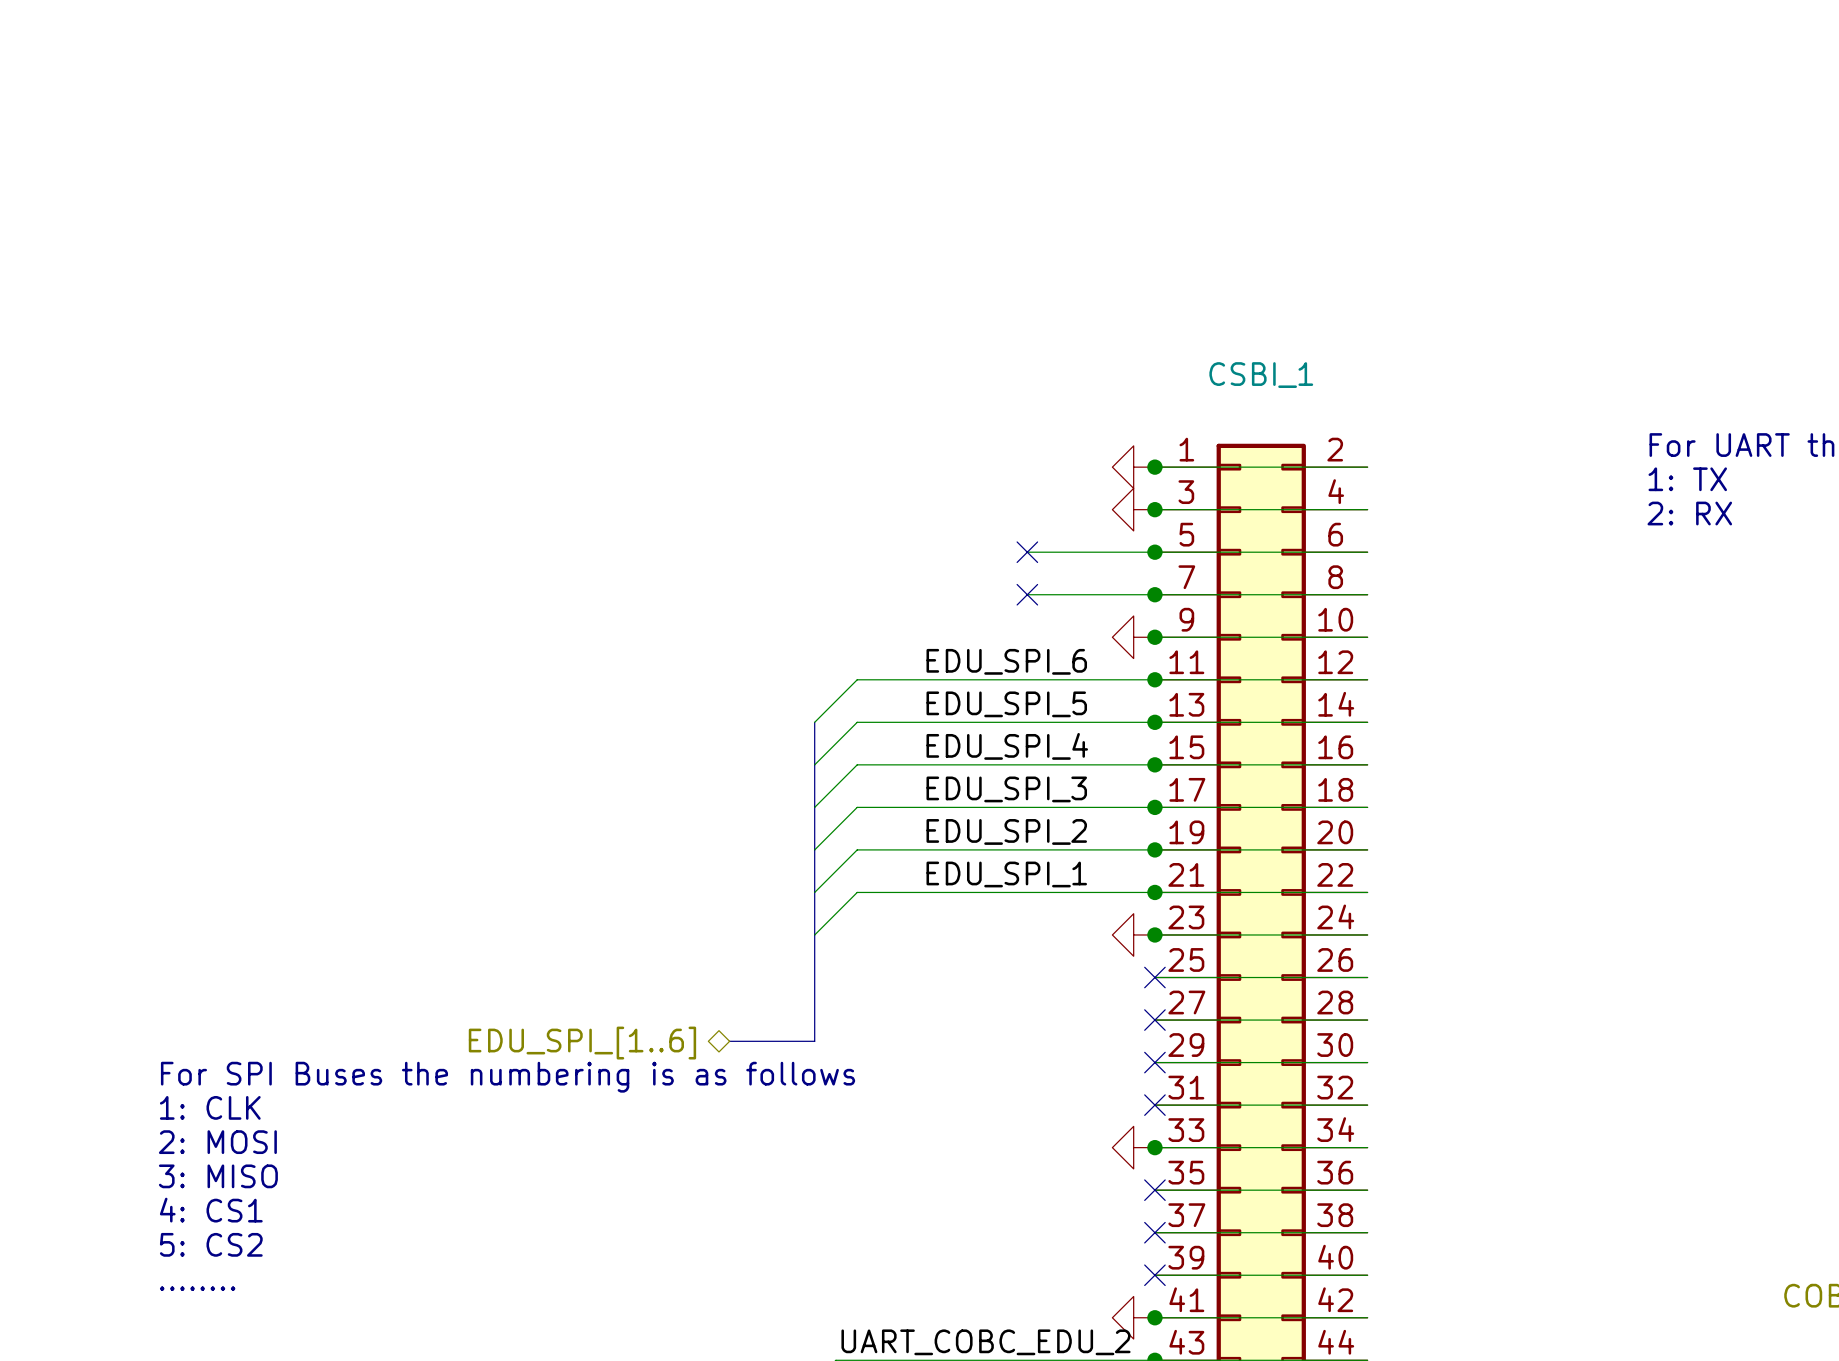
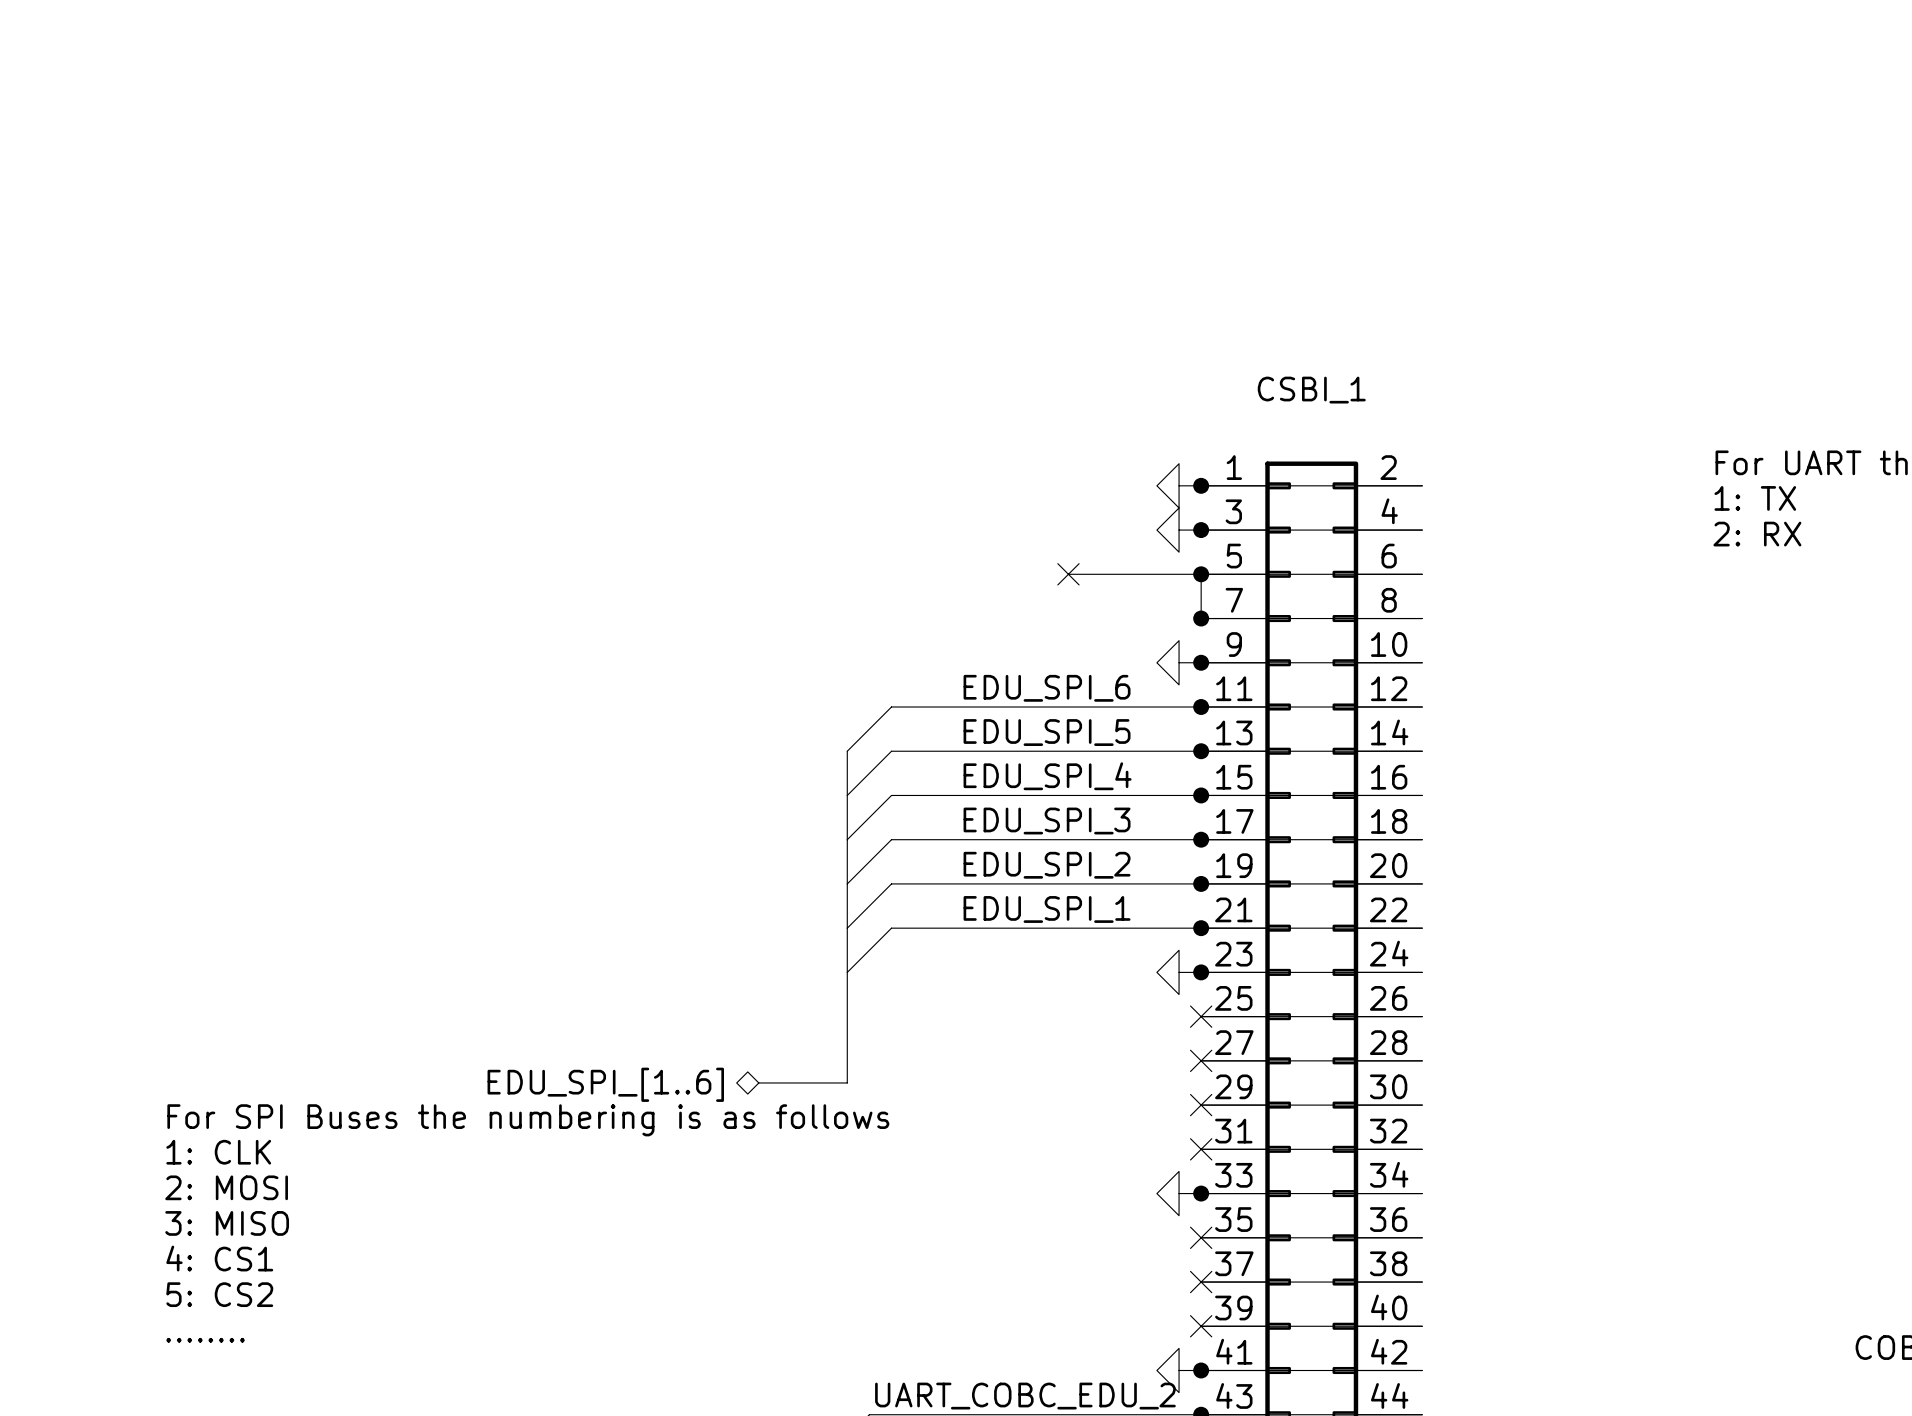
wire: (1027, 594) (1154, 594) -> (1201, 574) (1201, 618)
no-connect mark: (1027, 594) -> none

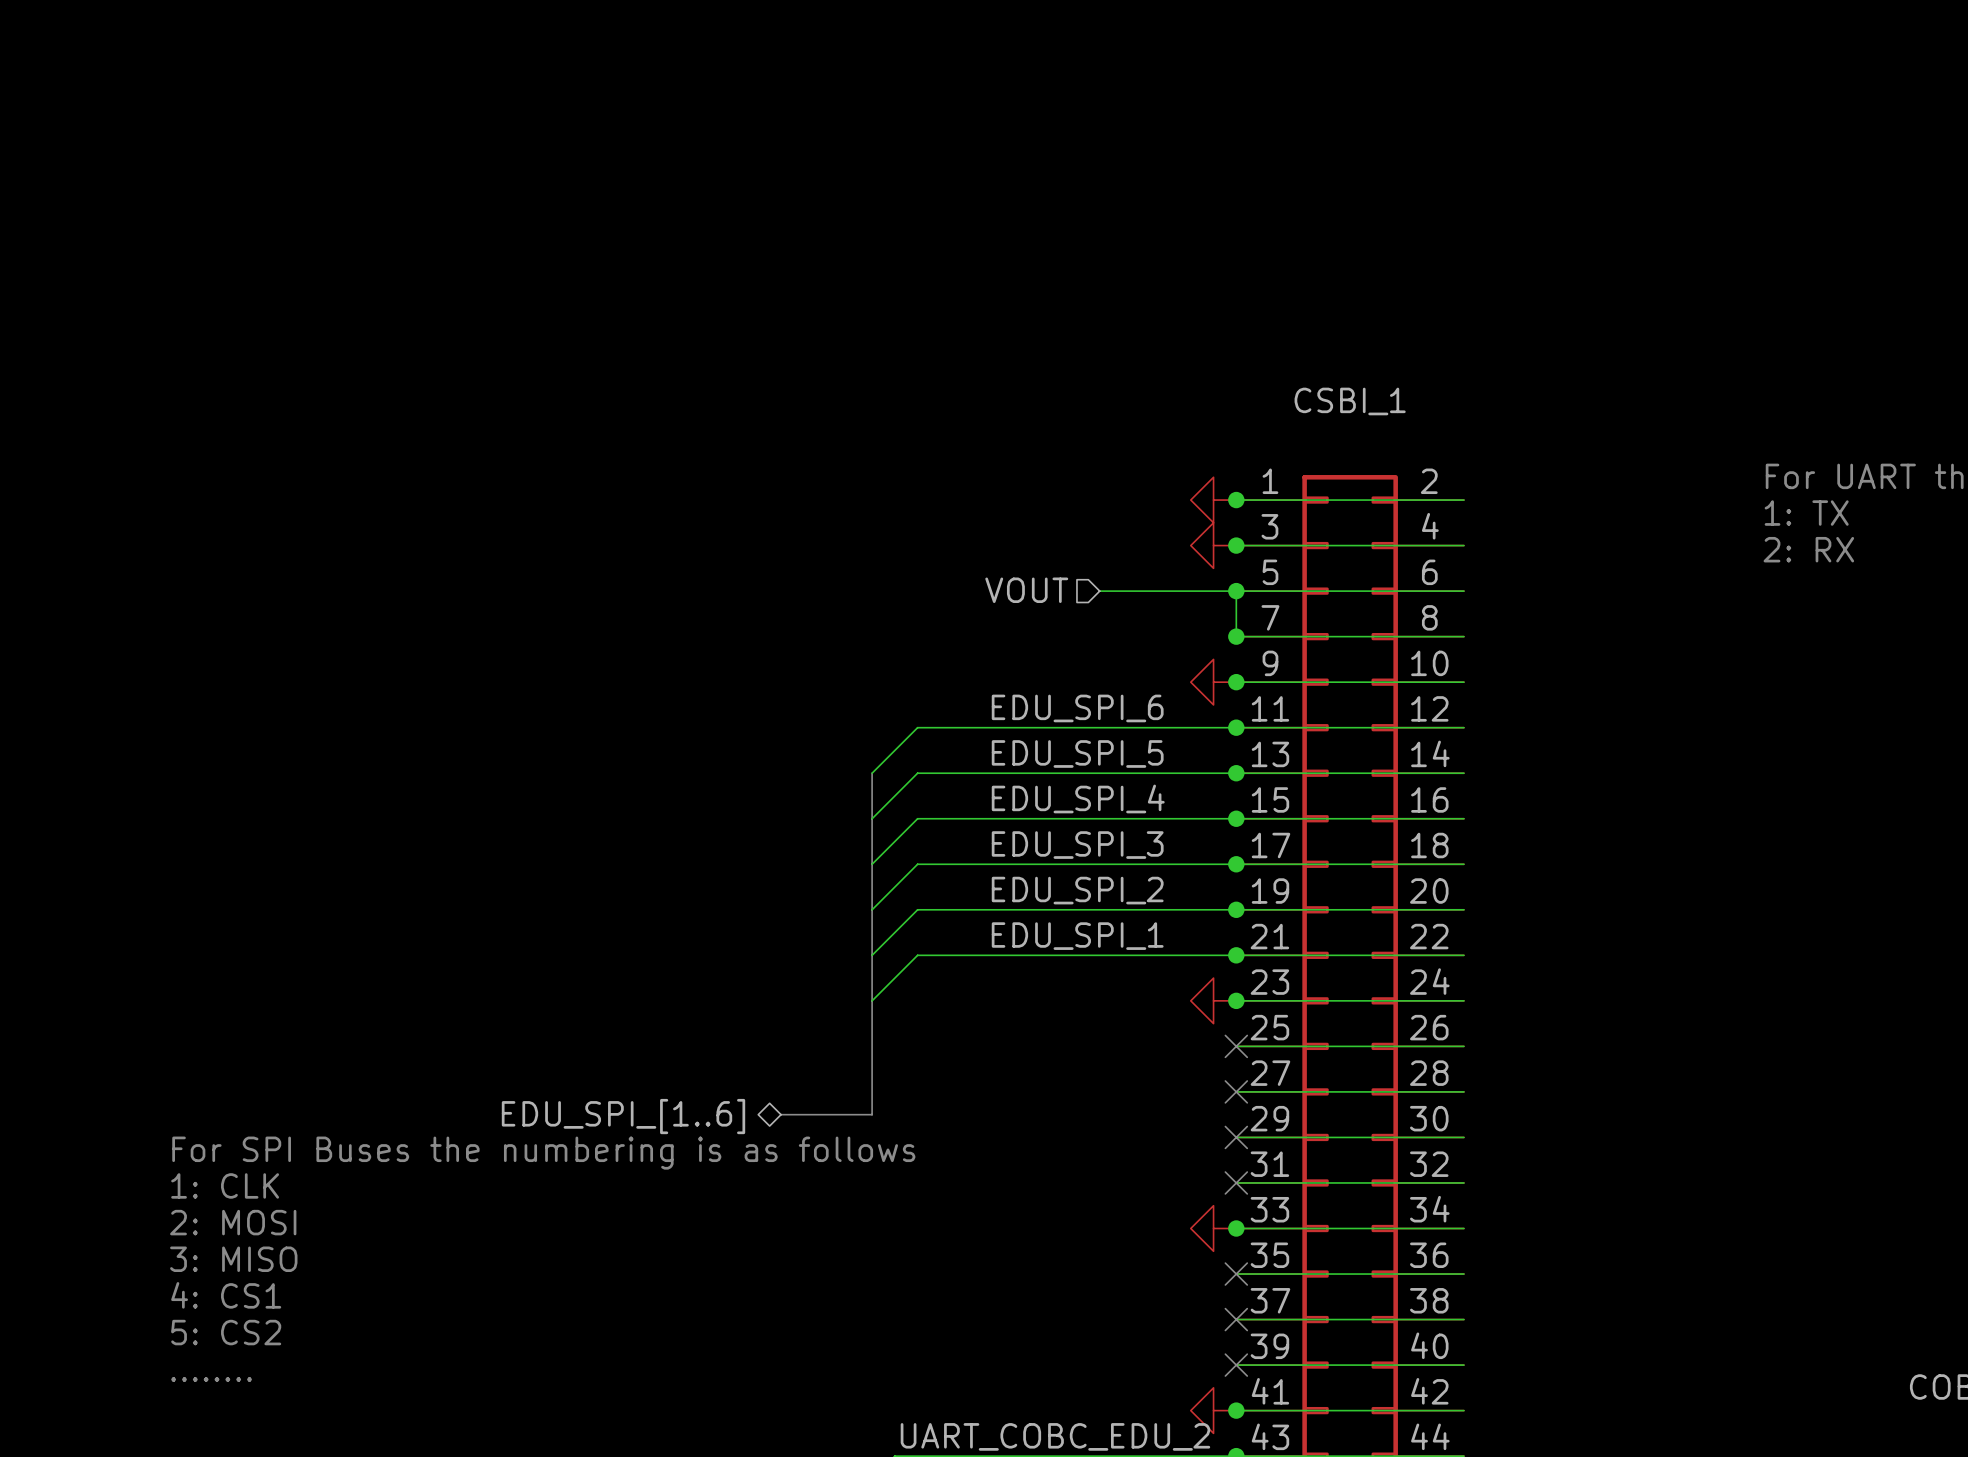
hierarchical label: none -> VOUT (1026, 590)
no-connect mark: (1068, 574) -> none

